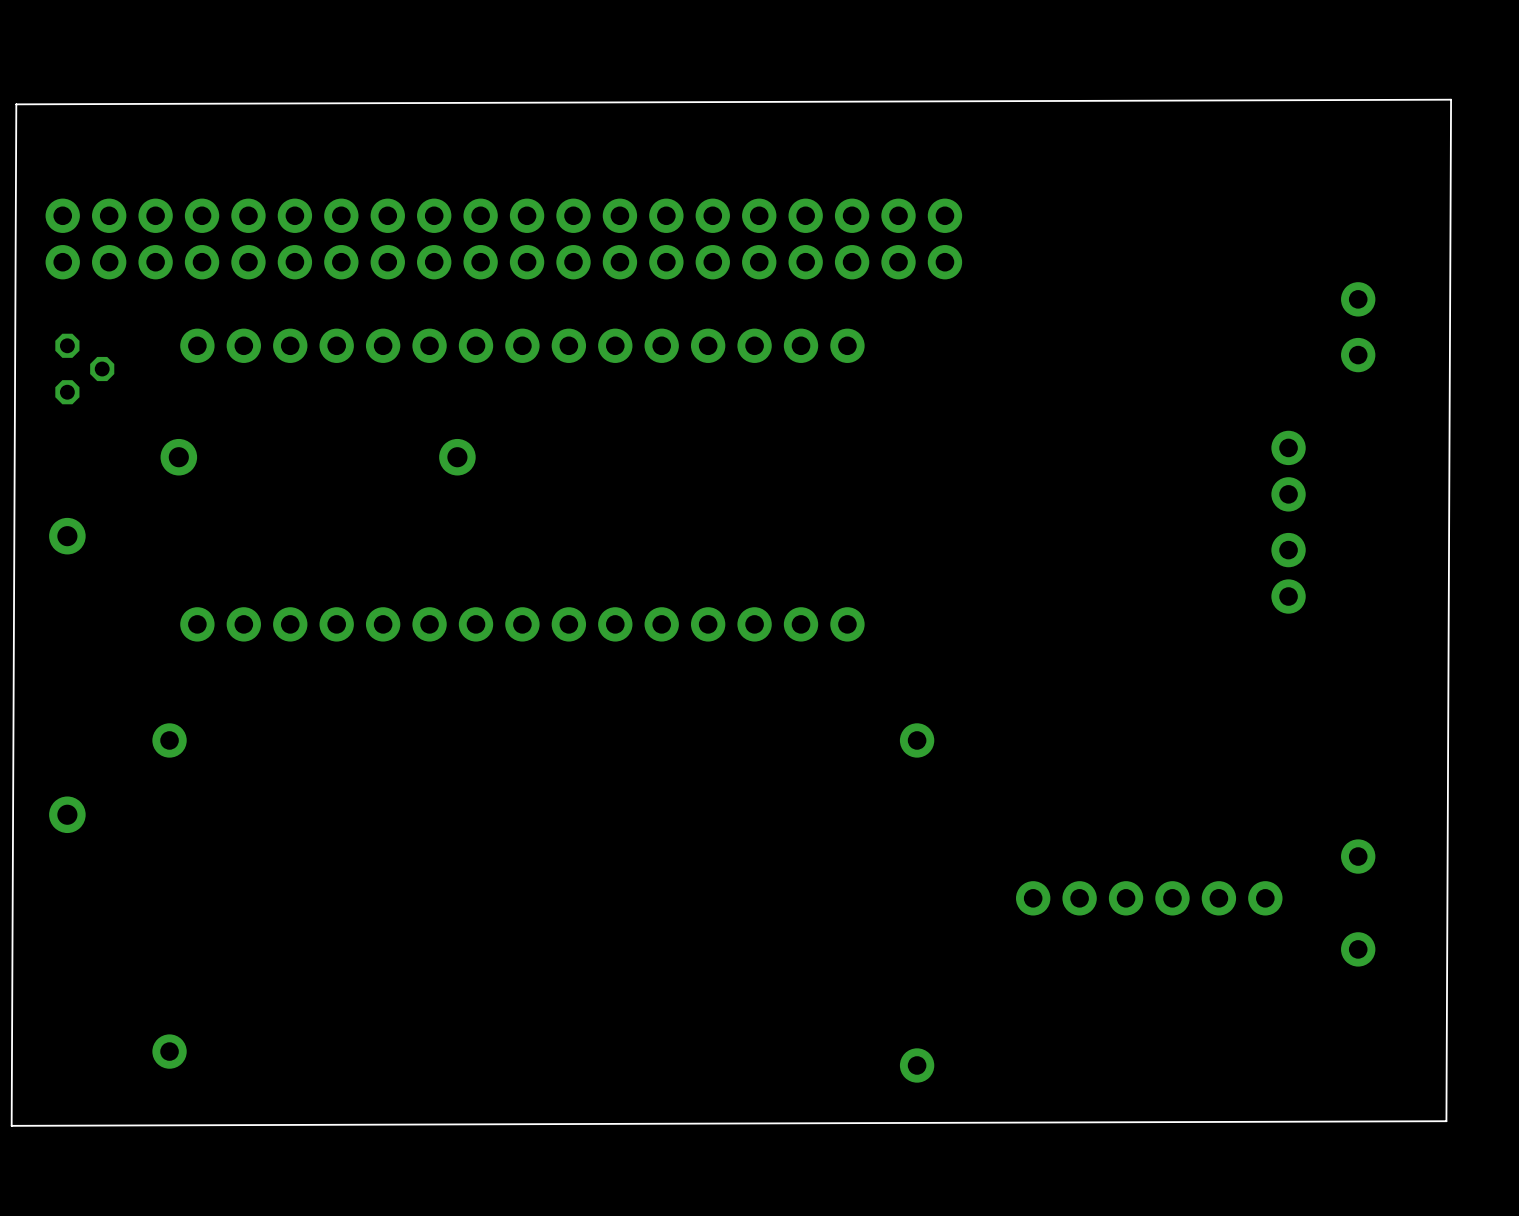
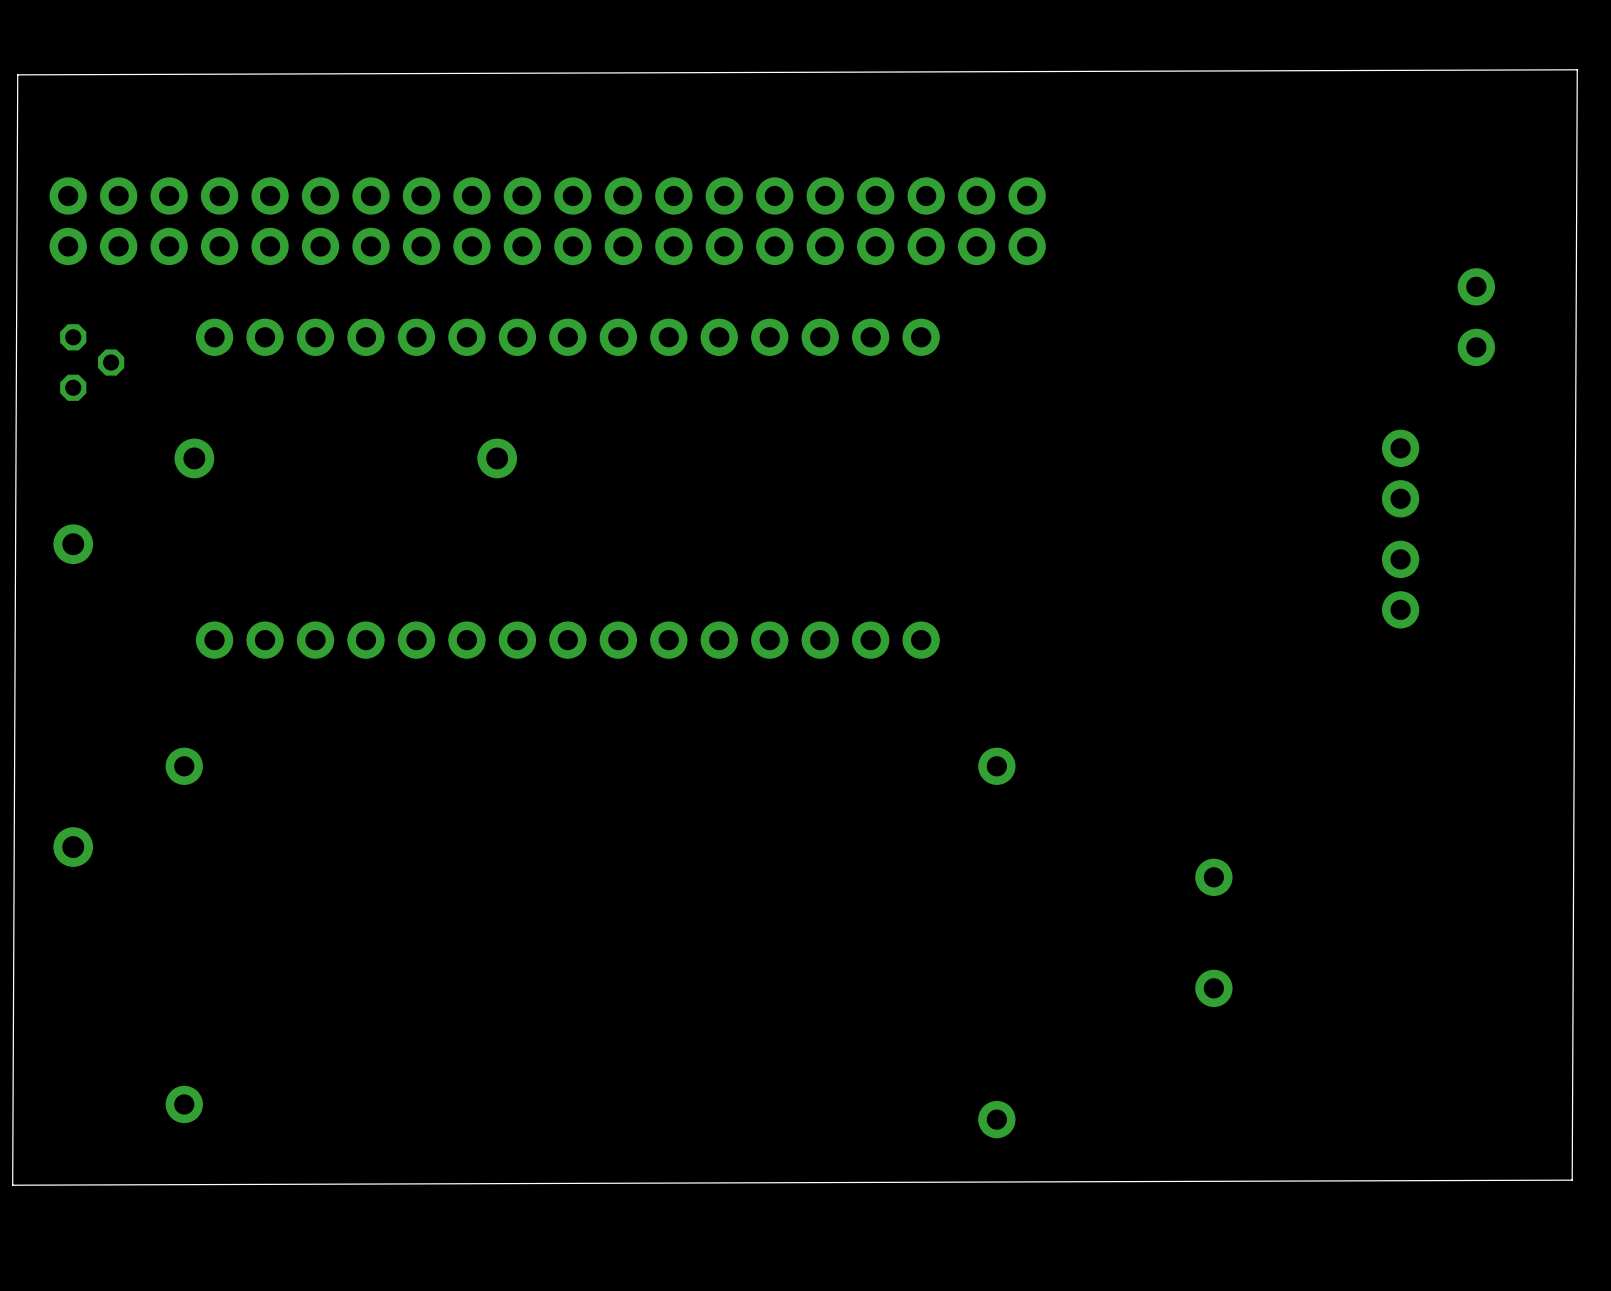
part: none -> (1213, 877)
part: (1358, 856) -> none
part: (1149, 898) -> none
part: none -> (1213, 988)
part: (1358, 949) -> none

